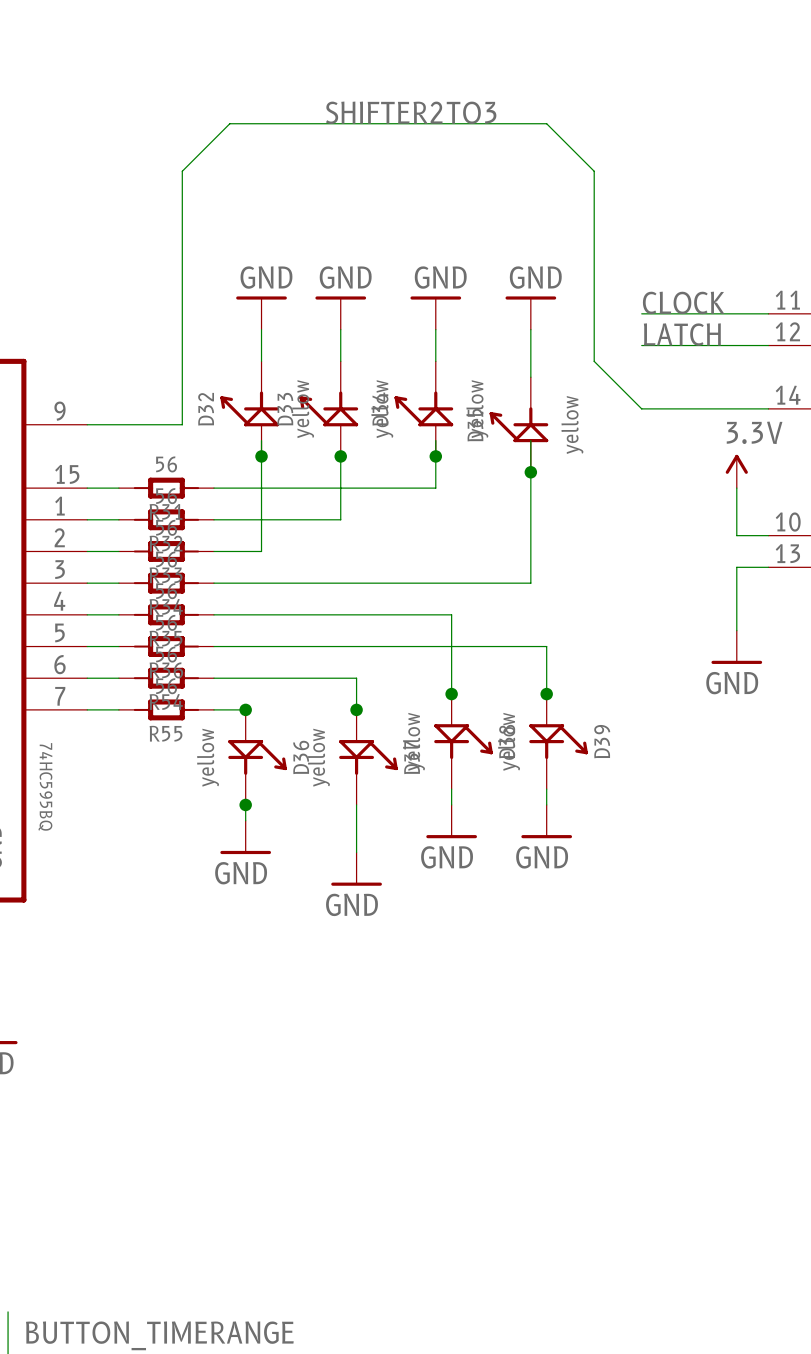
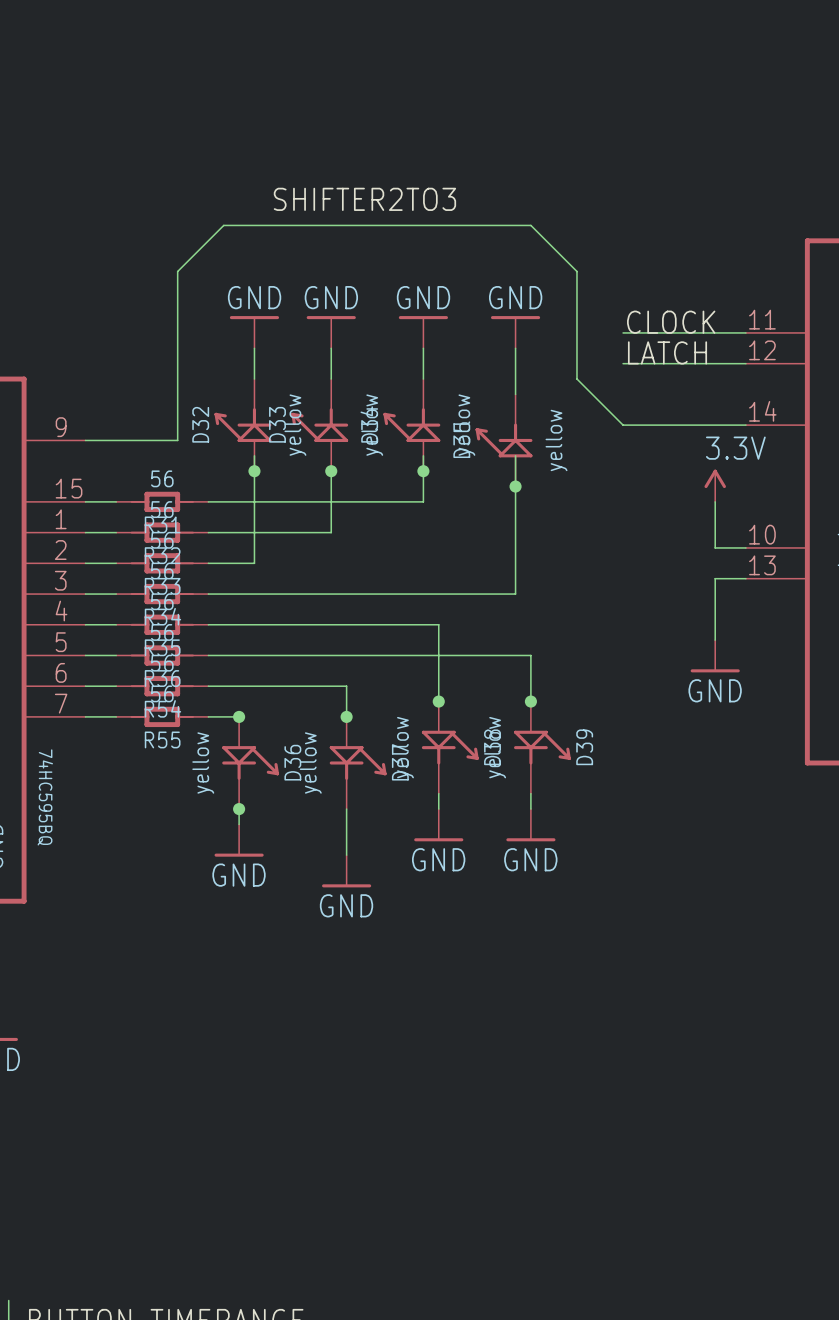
label position: SHIFTER2TO3 (411, 112) -> SHIFTER2TO3 (364, 199)
wire: (182, 250) (182, 171) (229, 123) (546, 123) (594, 171) (594, 250) -> (177, 271) (223, 225) (530, 225) (576, 271)

